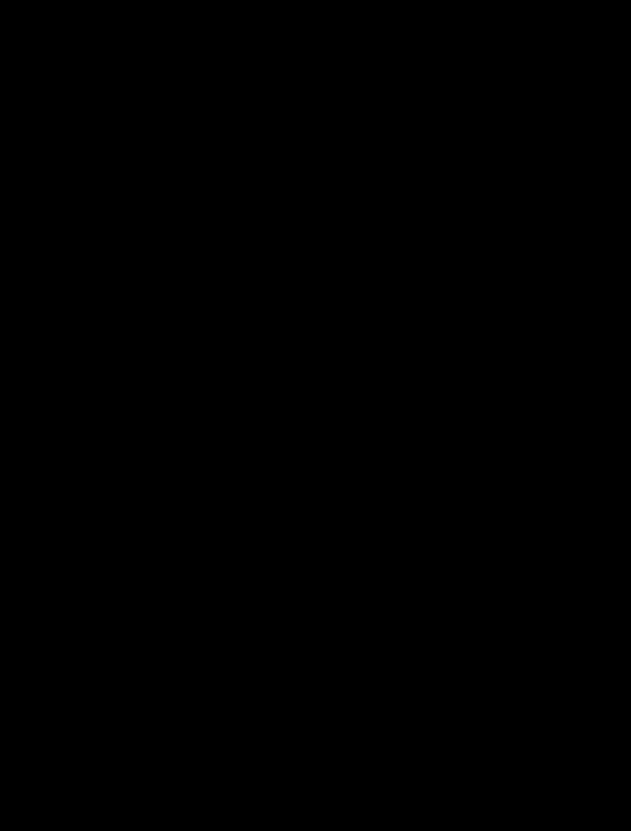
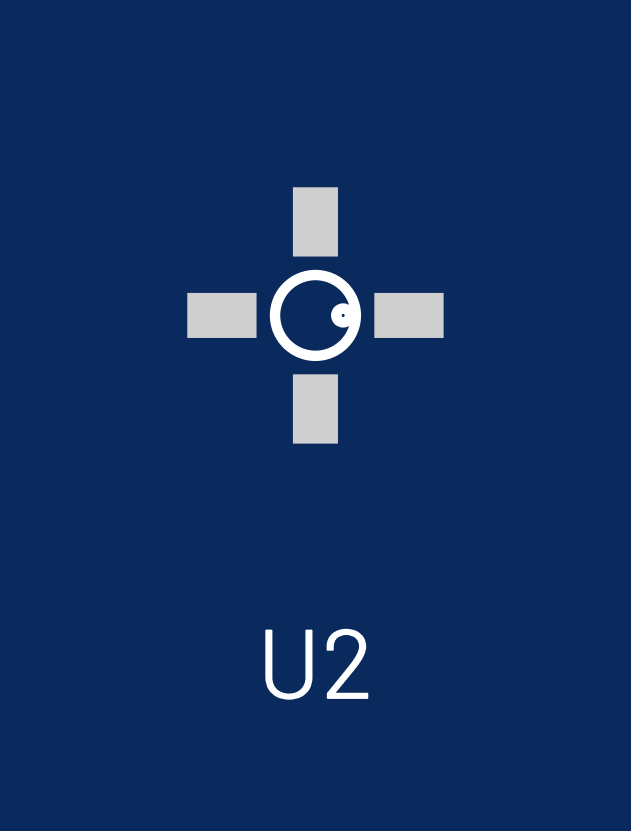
U2: none -> (315, 315)

